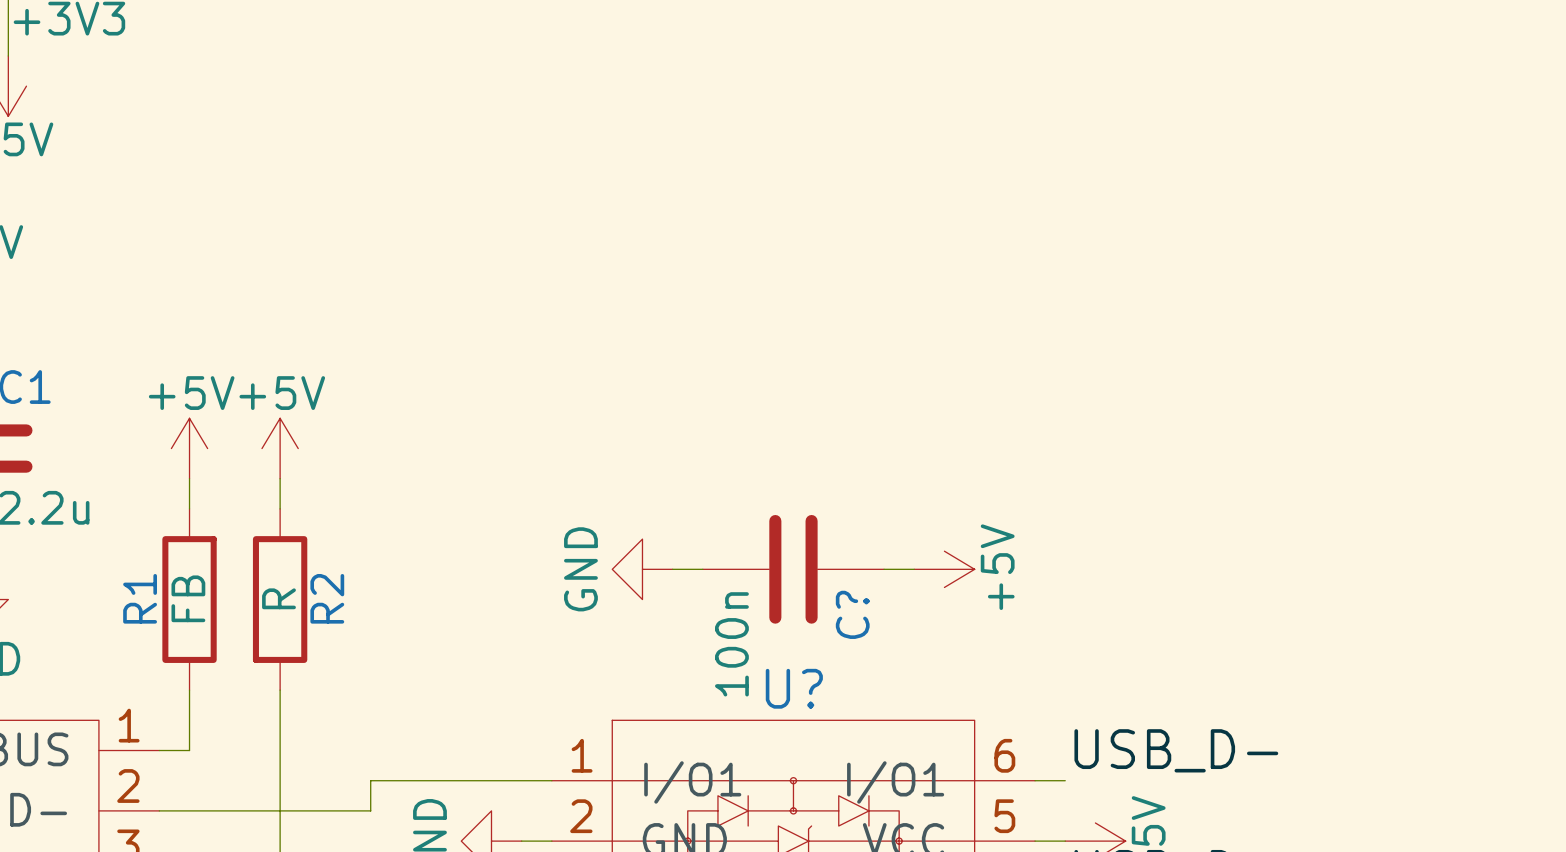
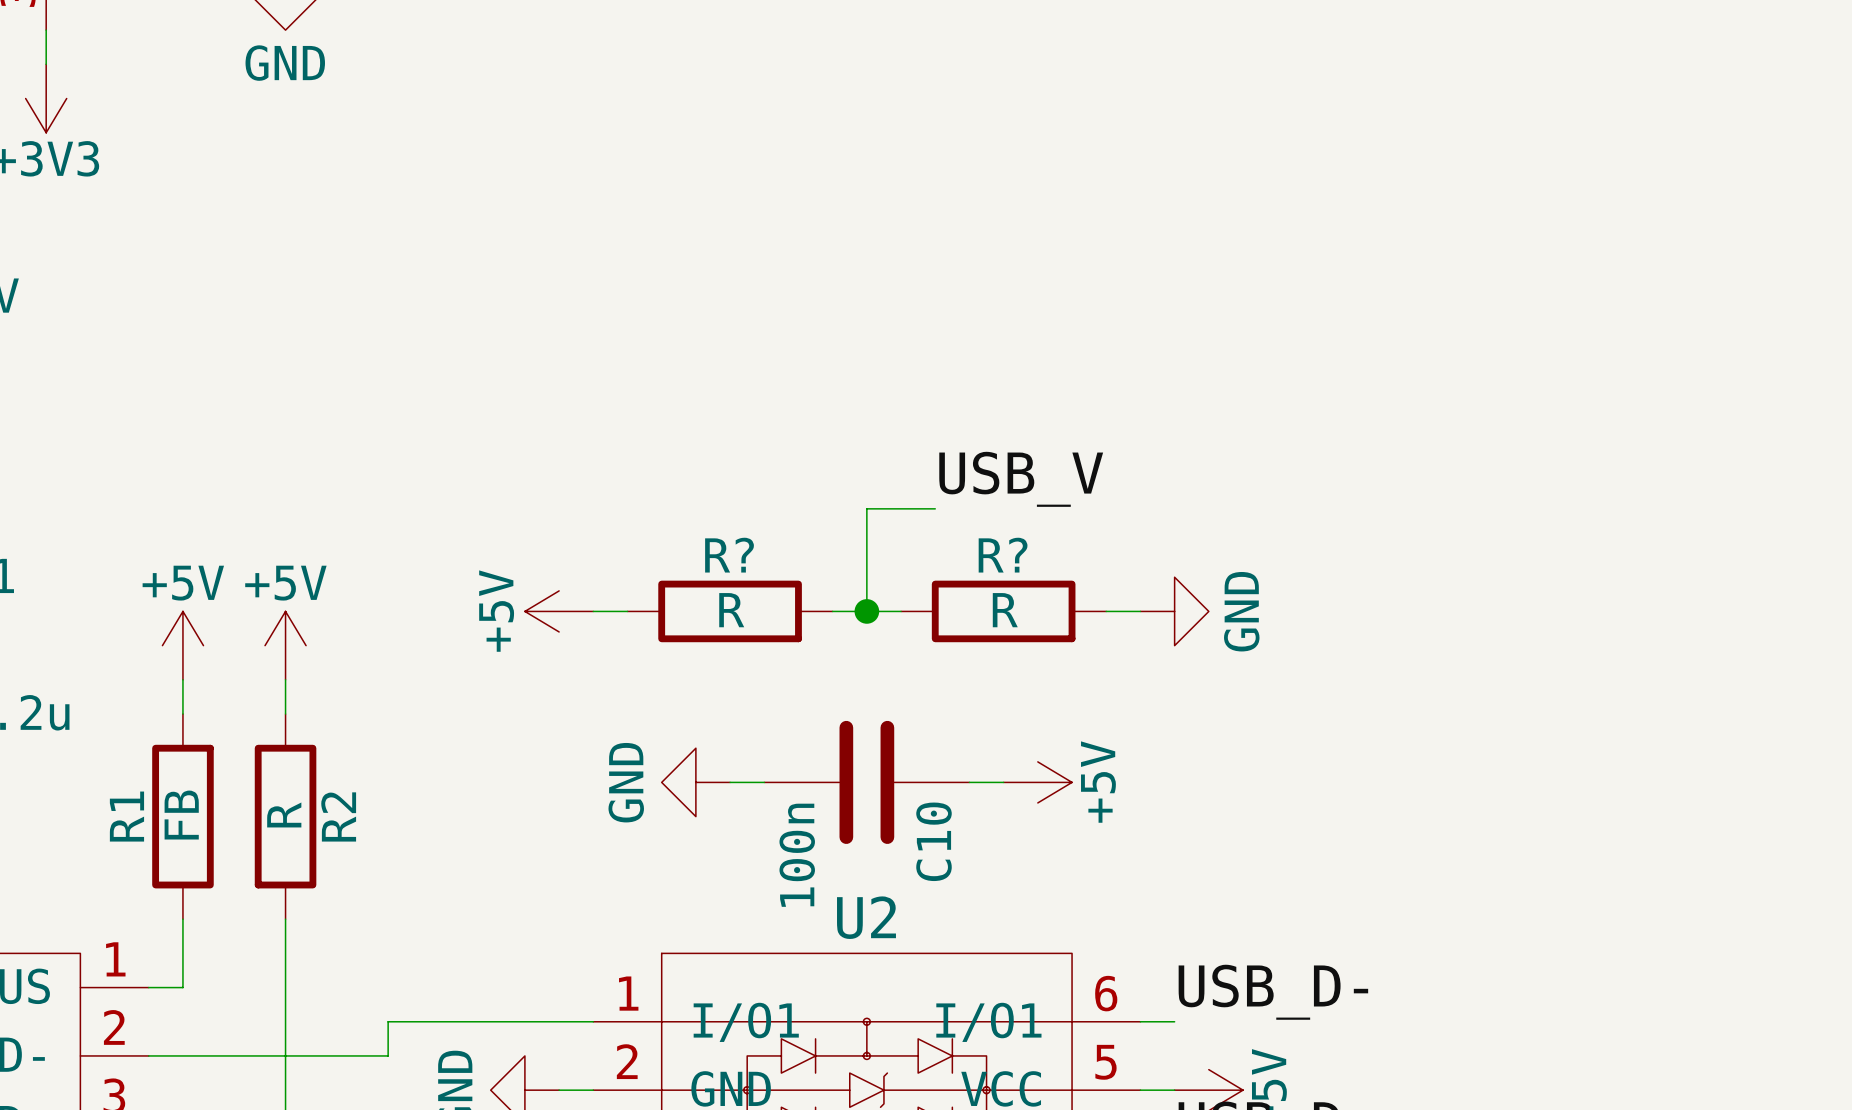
label: none -> USB_V (1021, 479)
wire: none -> (935, 508) (866, 508) (866, 611)
power symbol: none -> +5V (559, 611)
wire: none -> (593, 611) (627, 611)
R?: none -> R (730, 611)
wire: none -> (832, 611) (901, 611)
junction: none -> (866, 611)
R?: none -> R (1003, 611)
wire: none -> (1106, 611) (1140, 611)
power symbol: none -> GND (1174, 611)
C? name: C? (852, 614) -> C10 (934, 841)
U? name: U? (794, 688) -> U2 (866, 917)

